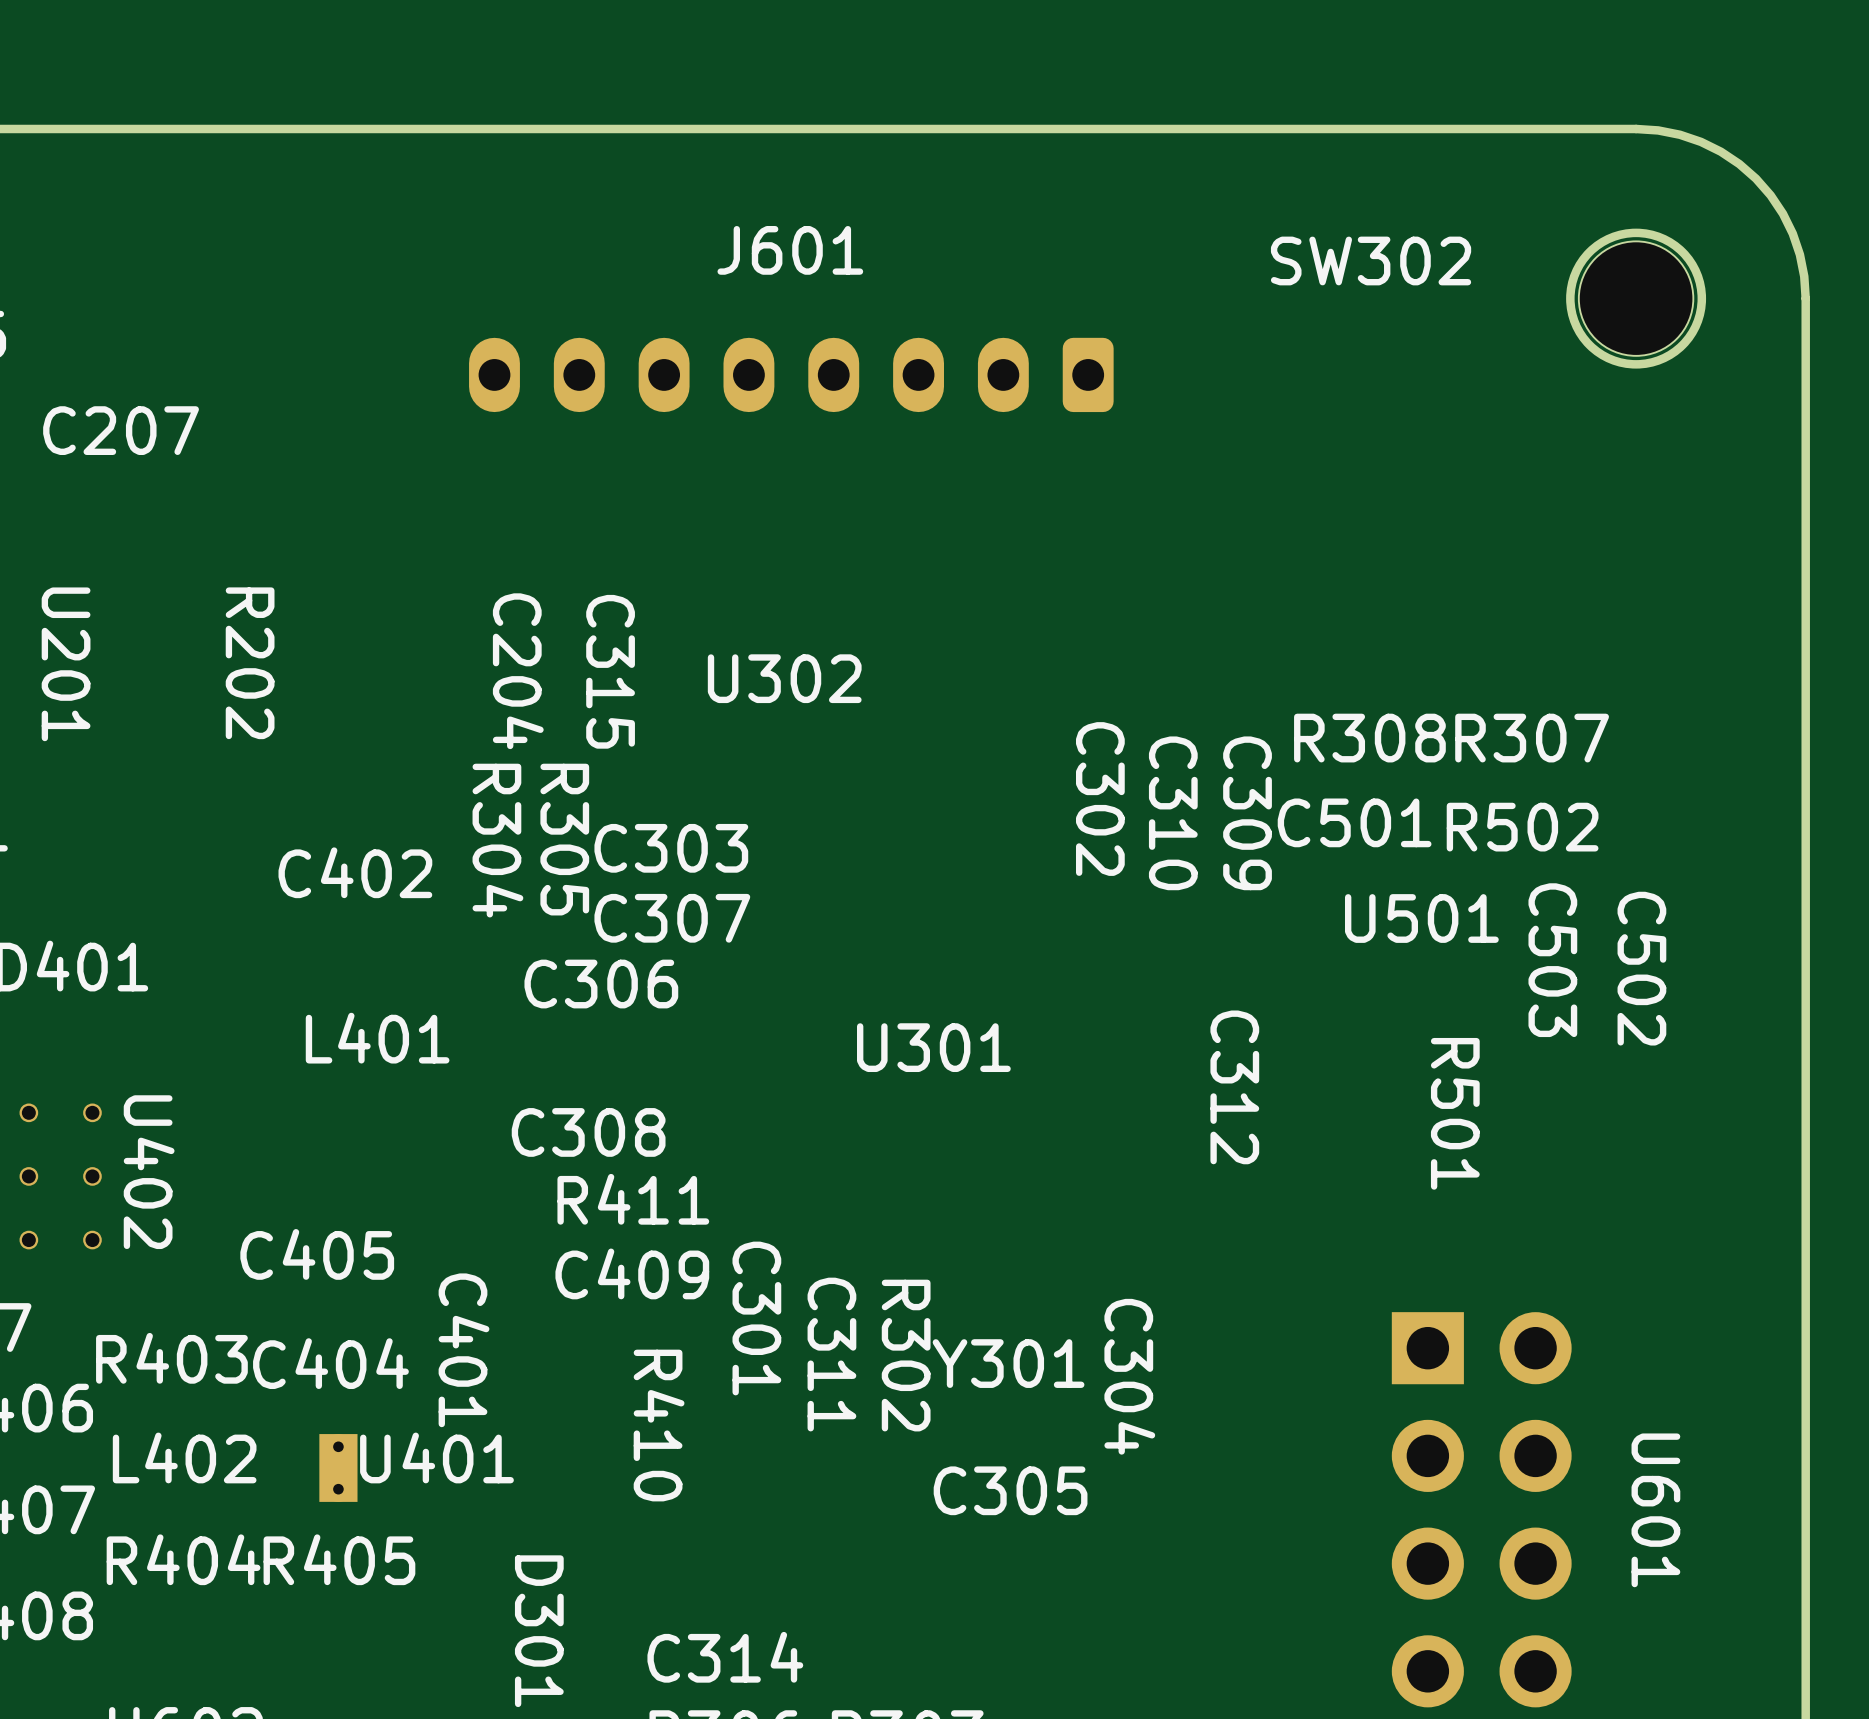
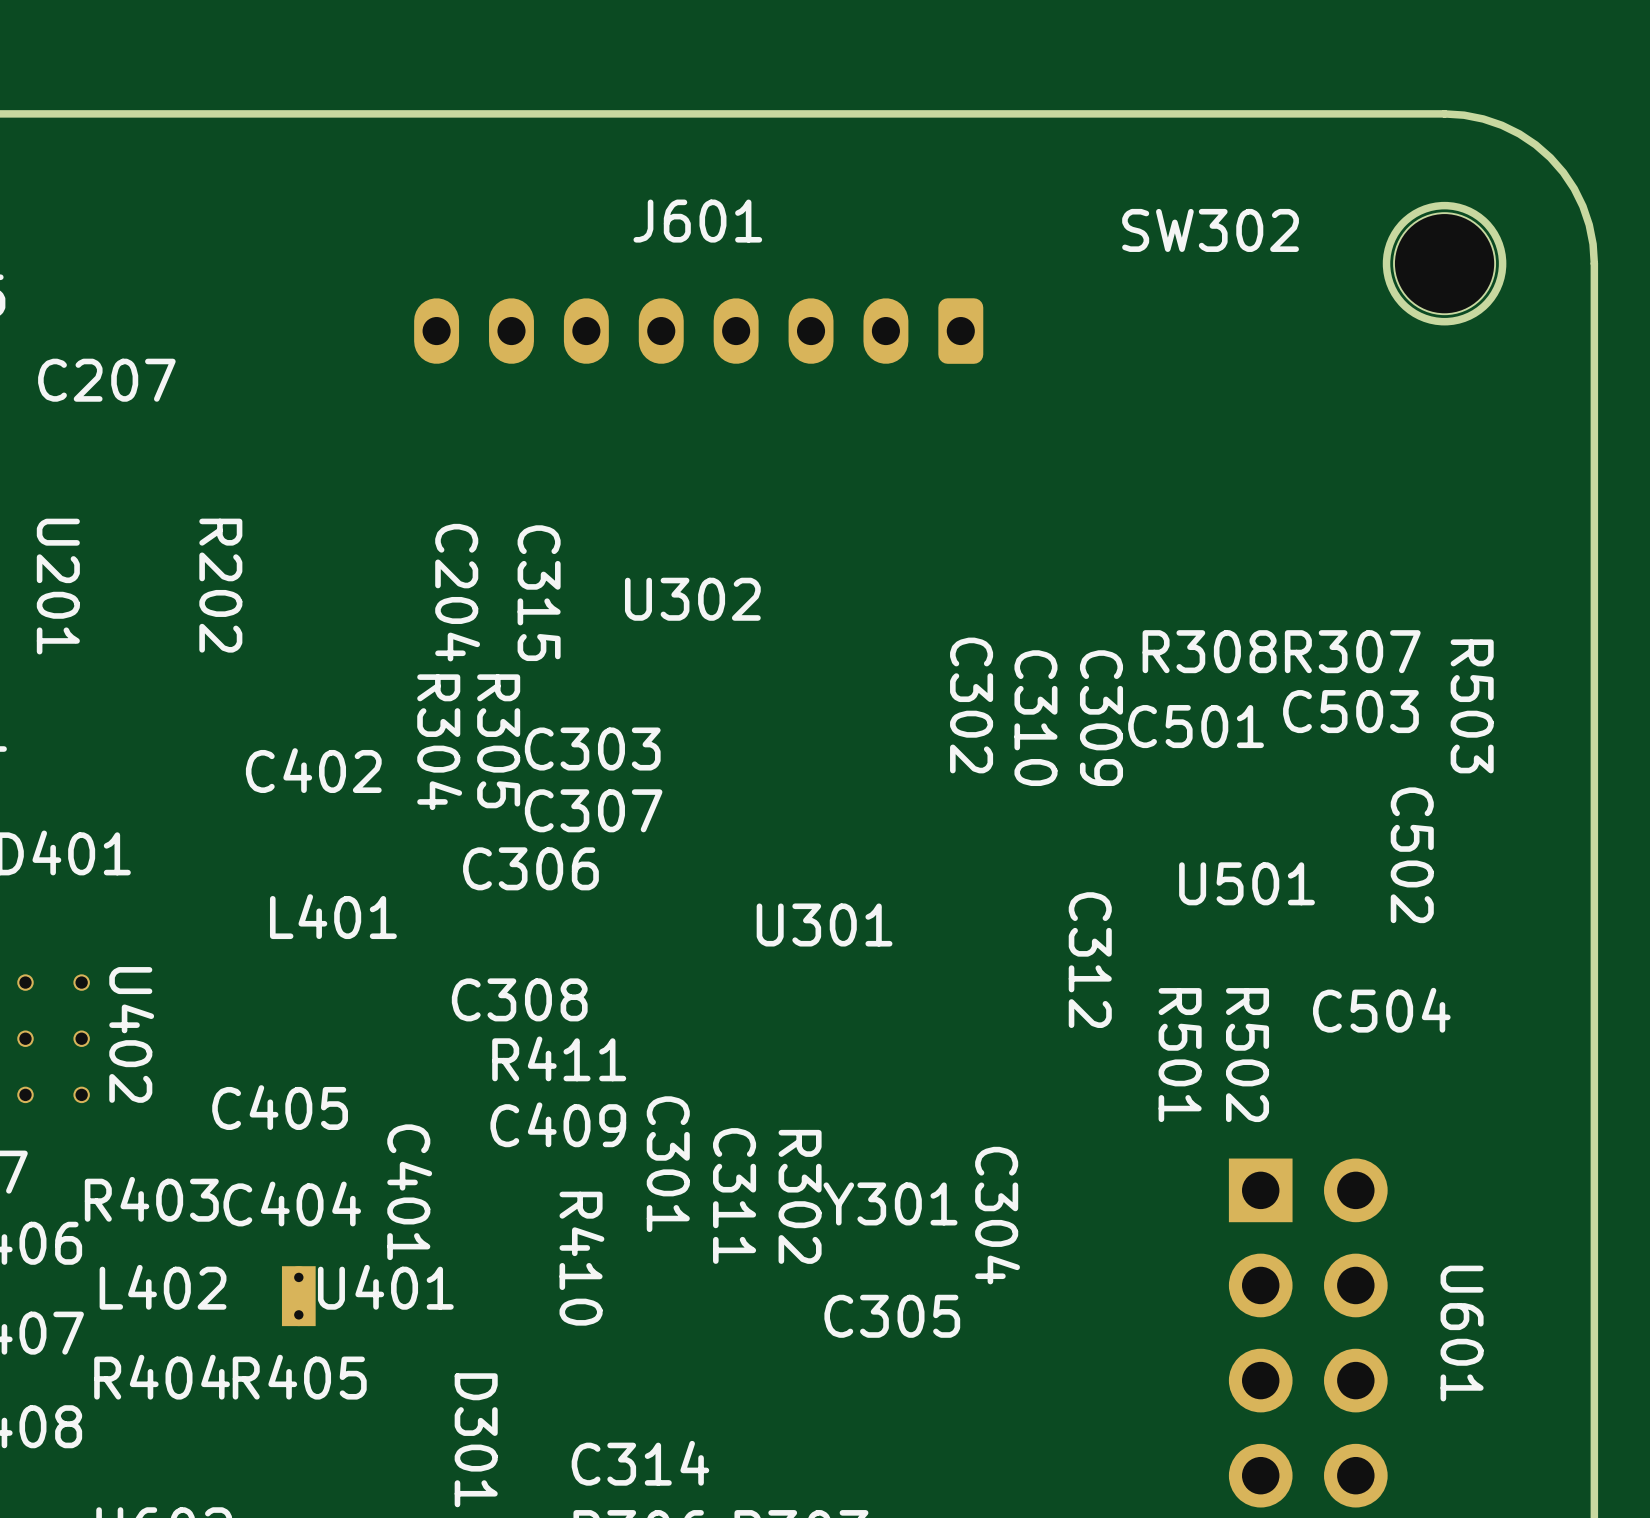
R503: none -> (1472, 706)
R502 position: (1522, 827) -> (1247, 1055)
R502 name rotation: 0° (1522, 827) -> 90° clockwise (1247, 1055)
U501 position: (1421, 918) -> (1247, 883)
C503 position: (1552, 960) -> (1350, 711)
C503 name rotation: 0° (1552, 960) -> 90° counterclockwise (1350, 711)
C502 position: (1641, 968) -> (1412, 855)
R501 position: (1455, 1113) -> (1180, 1055)
C504: none -> (1381, 1010)

